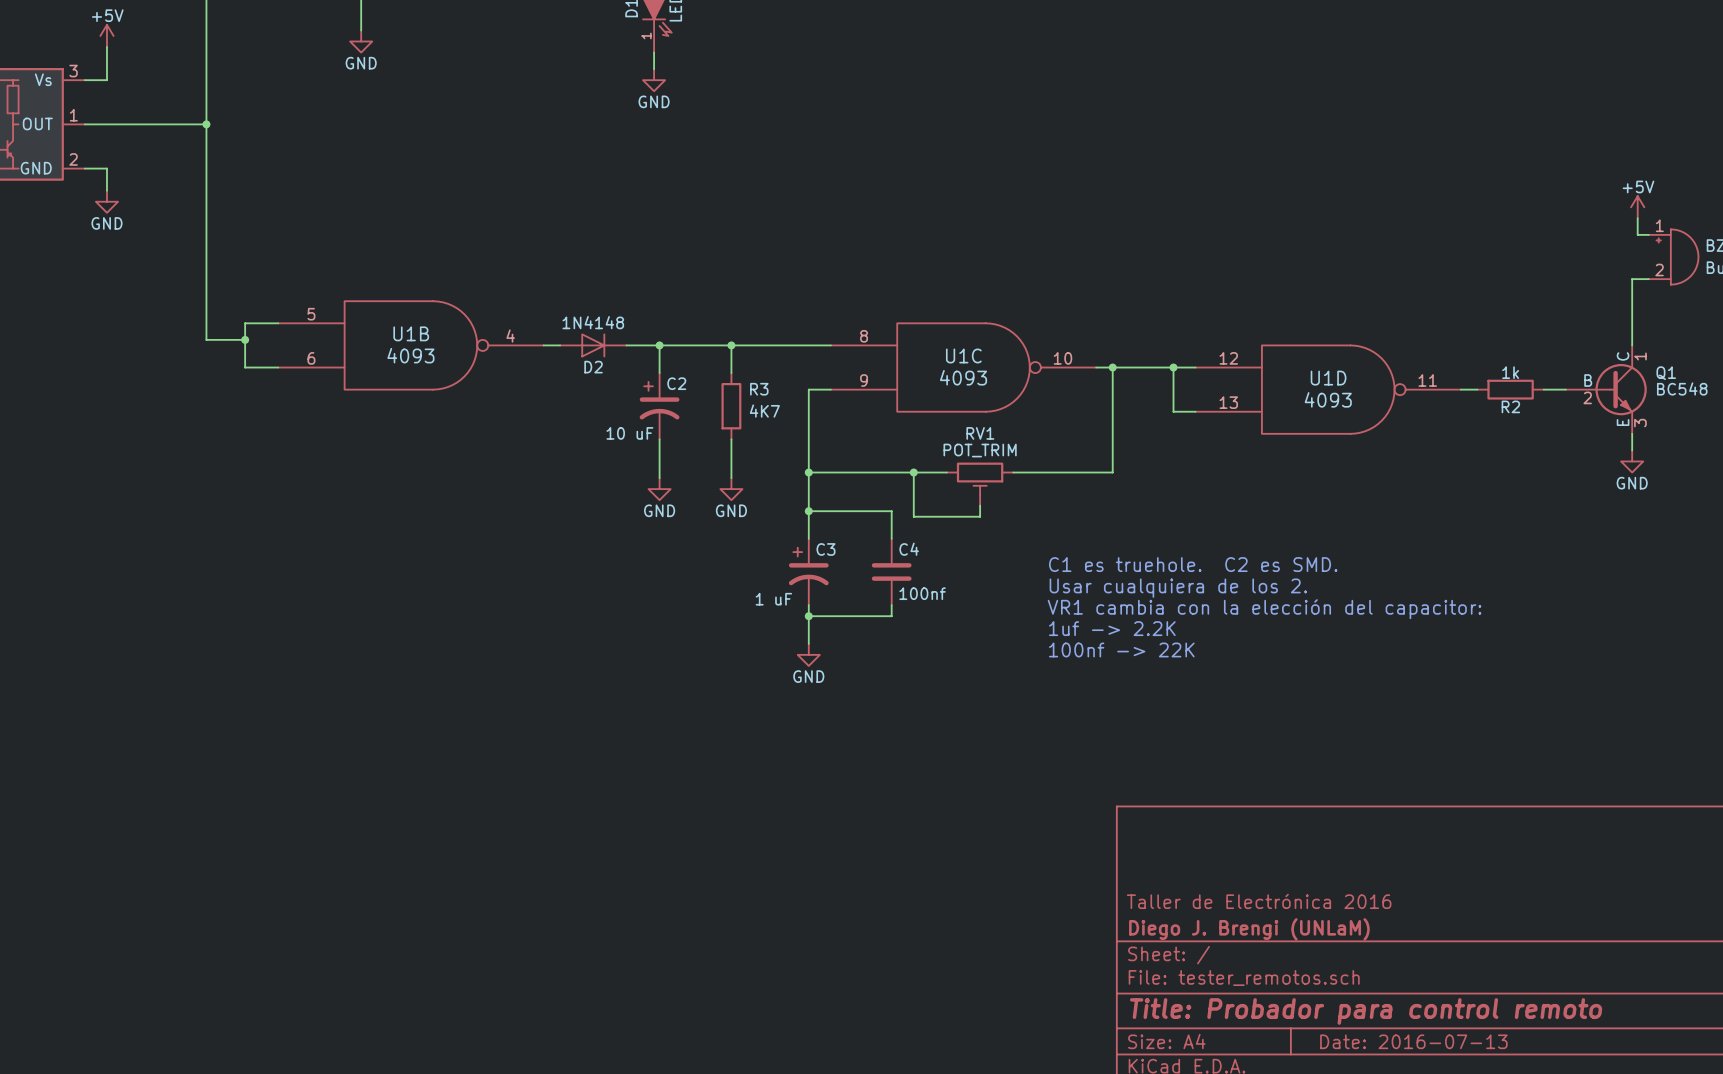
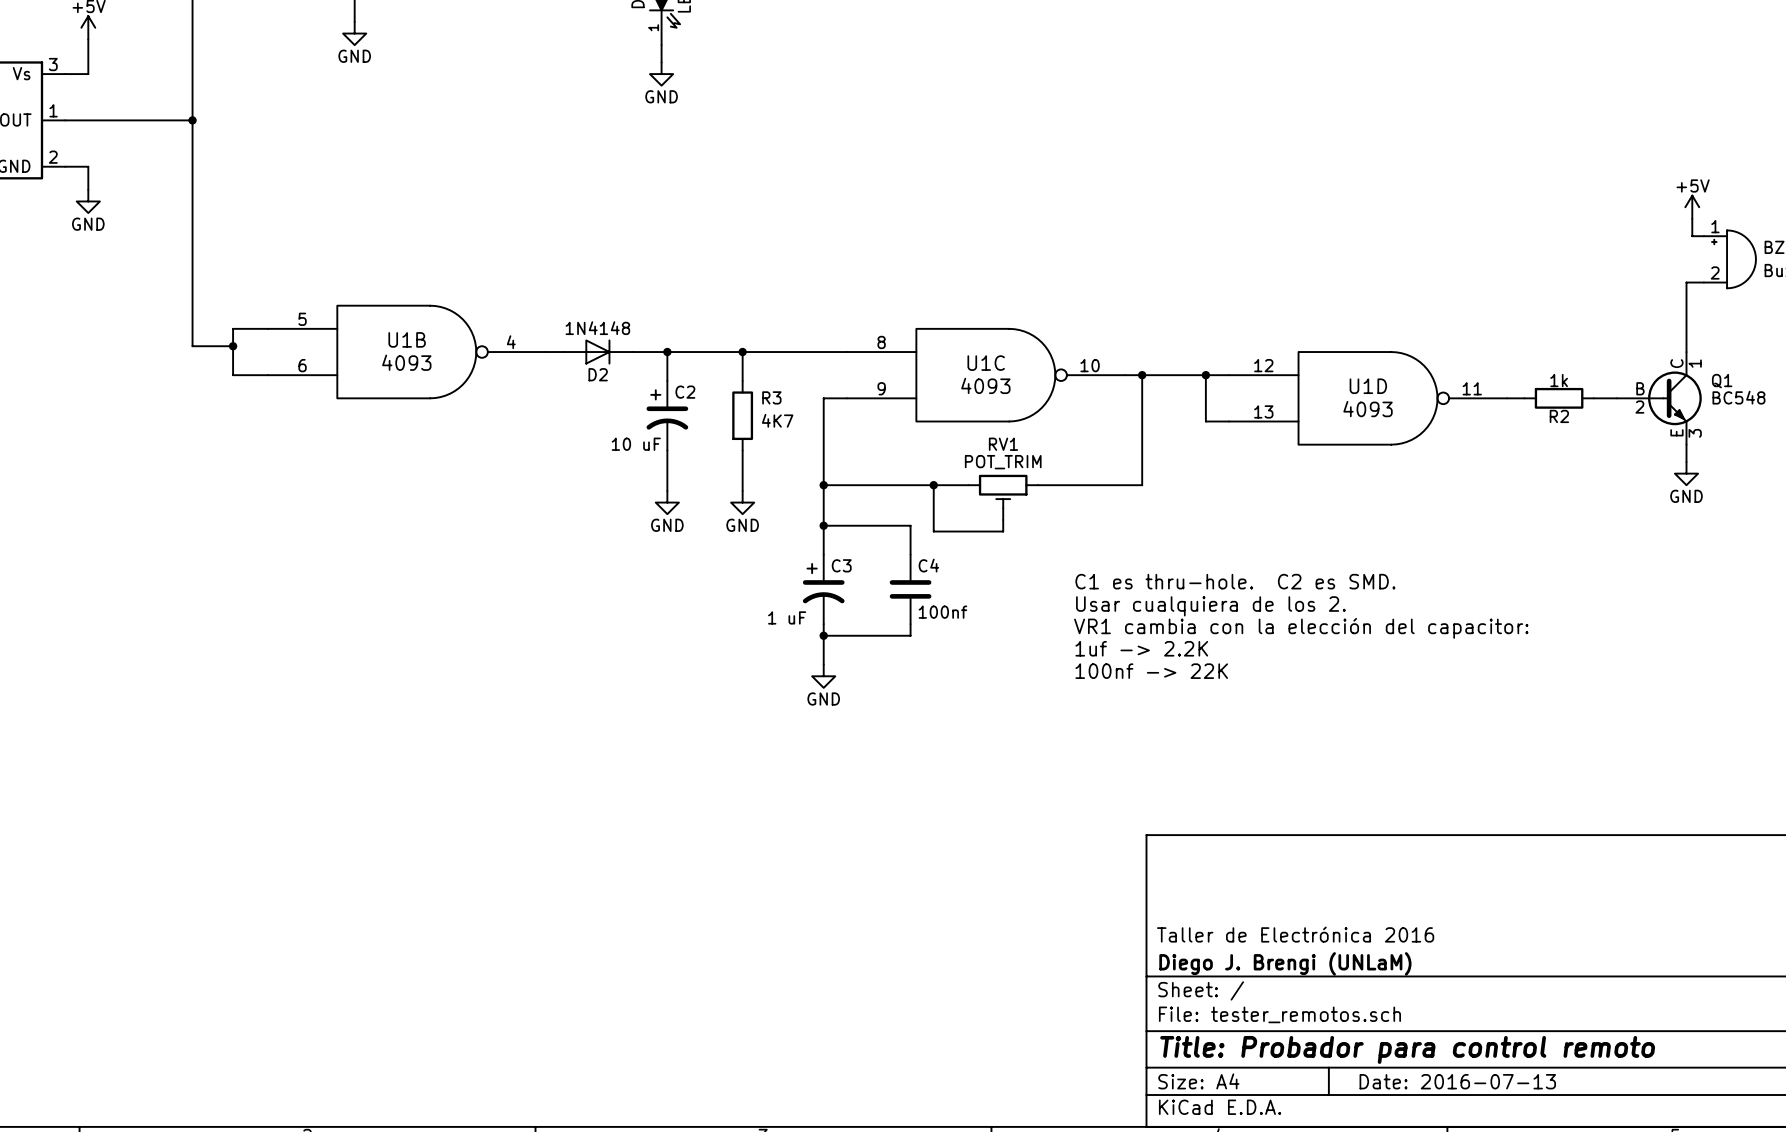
text: C1 es truehole. C2 es SMD. (1193, 564) -> C1 es thru-hole. C2 es SMD. (1235, 581)

